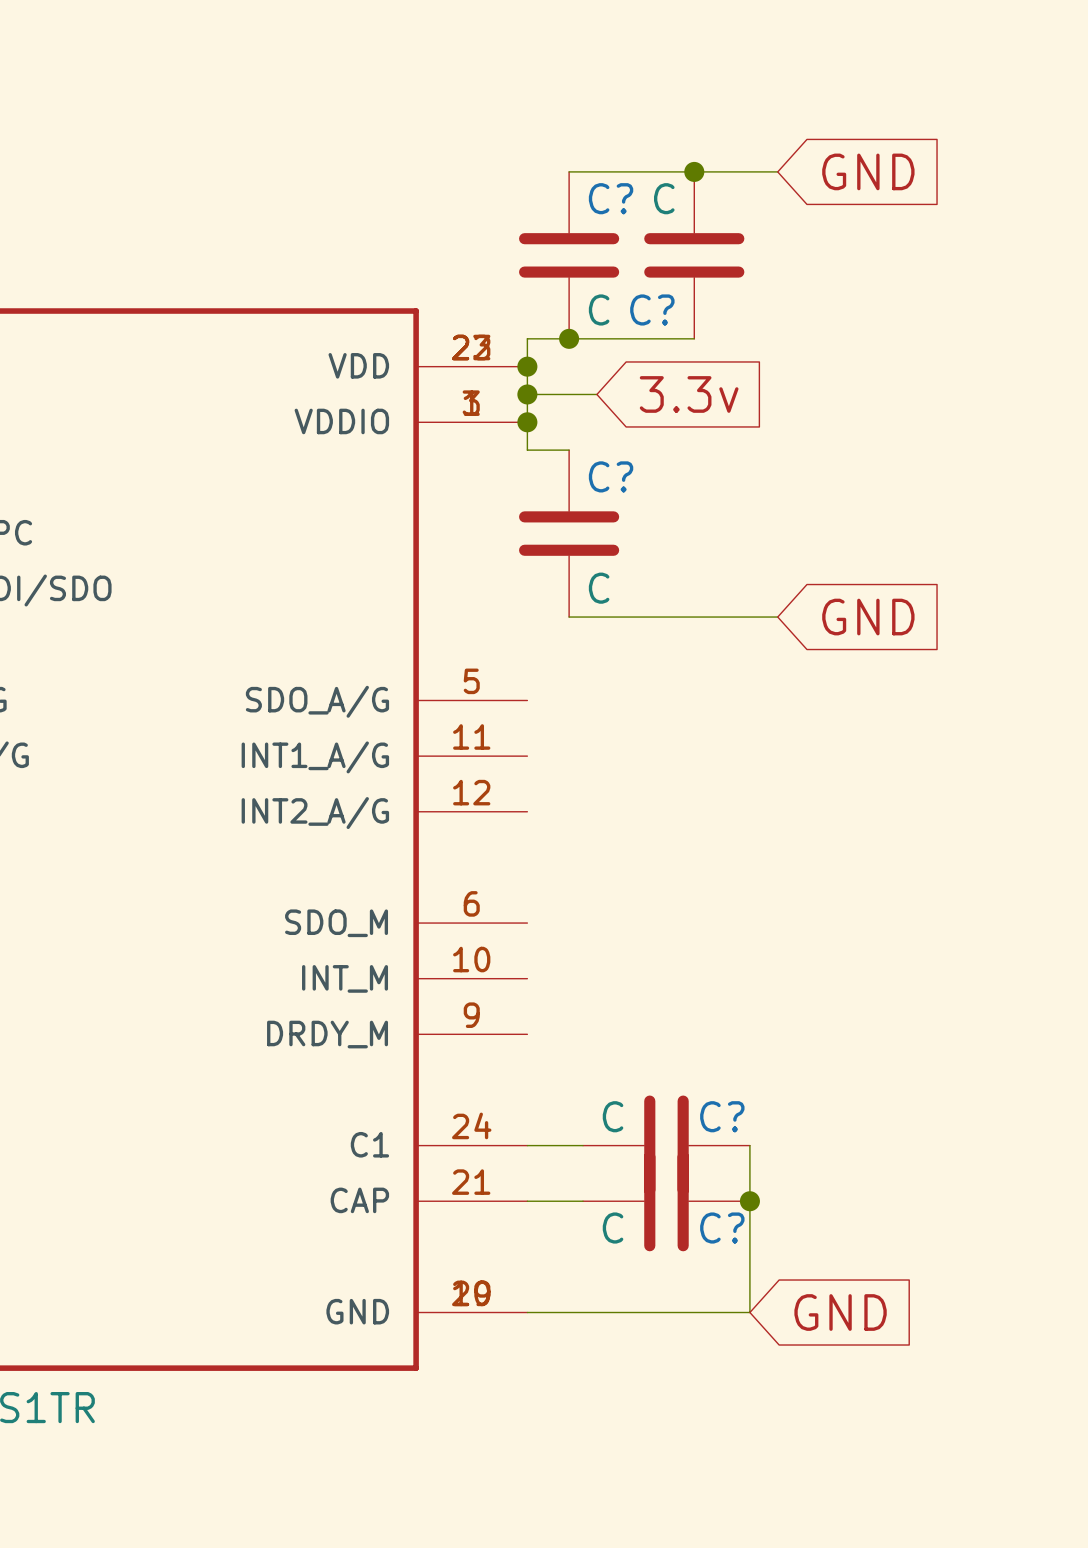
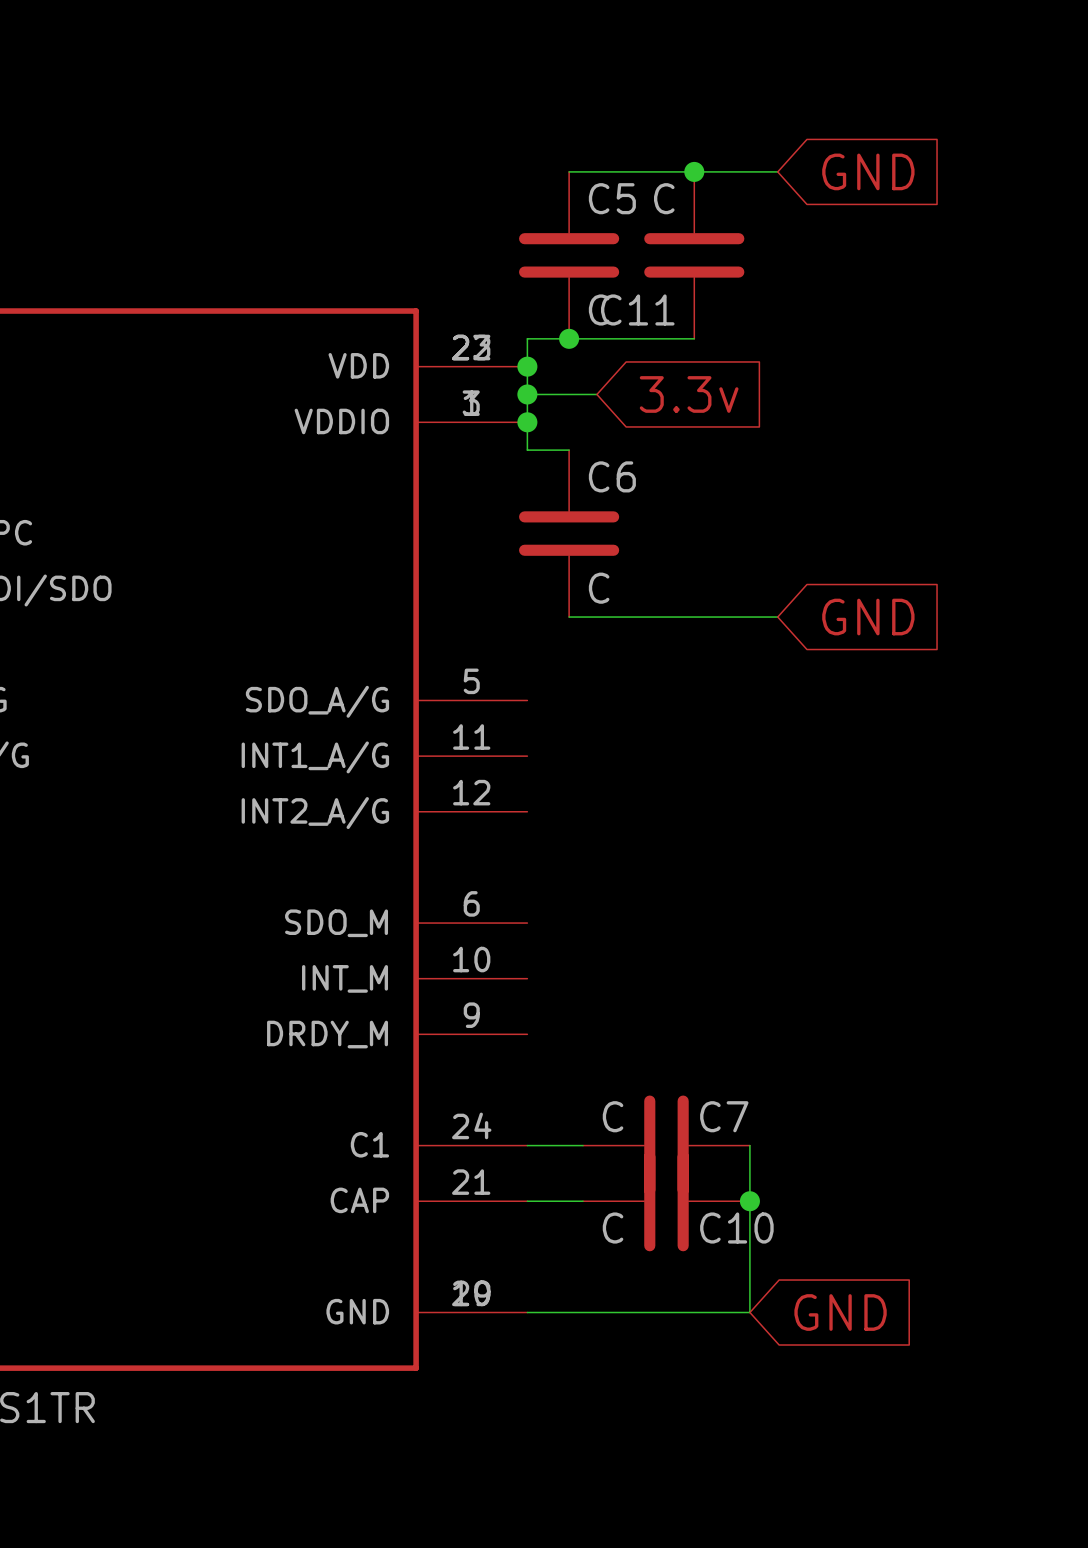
C? name: C? (611, 198) -> C5 (612, 198)
C? name: C? (652, 309) -> C11 (637, 309)
C? name: C? (611, 476) -> C6 (612, 476)
C? name: C? (722, 1116) -> C7 (724, 1116)
C? name: C? (722, 1228) -> C10 (736, 1228)

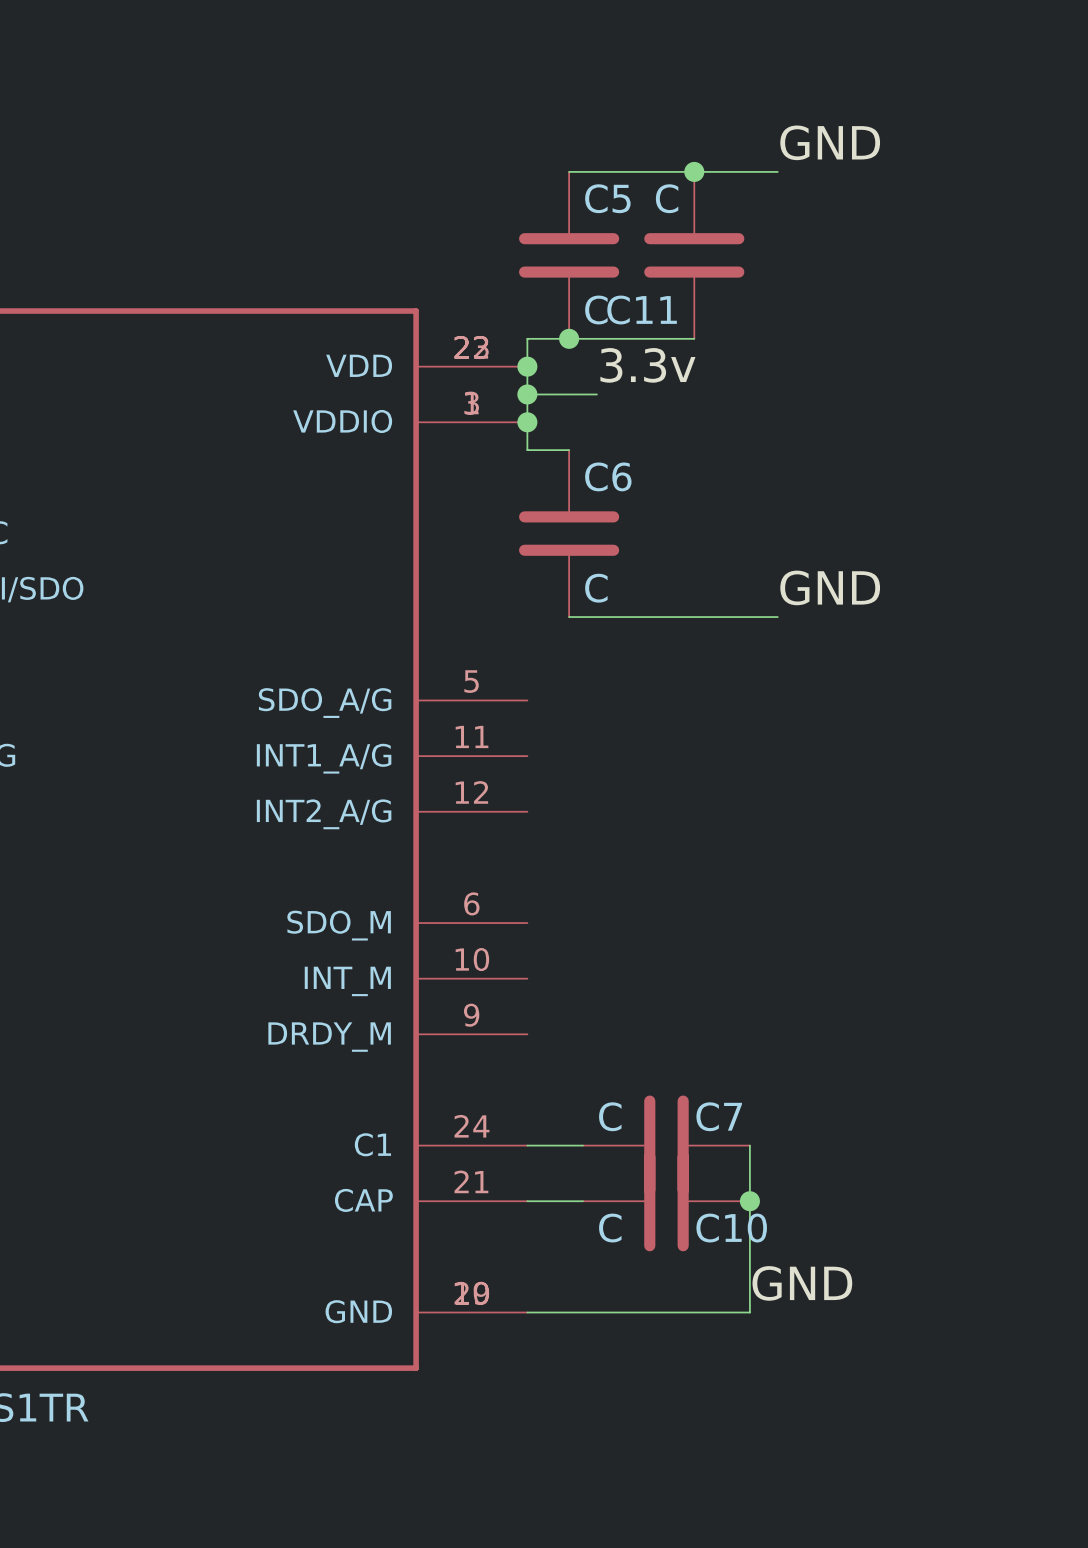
label: none -> GND (830, 142)
global label: GND (868, 171) -> none
label: none -> 3.3v (647, 365)
global label: 3.3v (689, 394) -> none
label: none -> GND (830, 587)
global label: GND (868, 617) -> none
label: none -> GND (802, 1283)
global label: GND (840, 1312) -> none

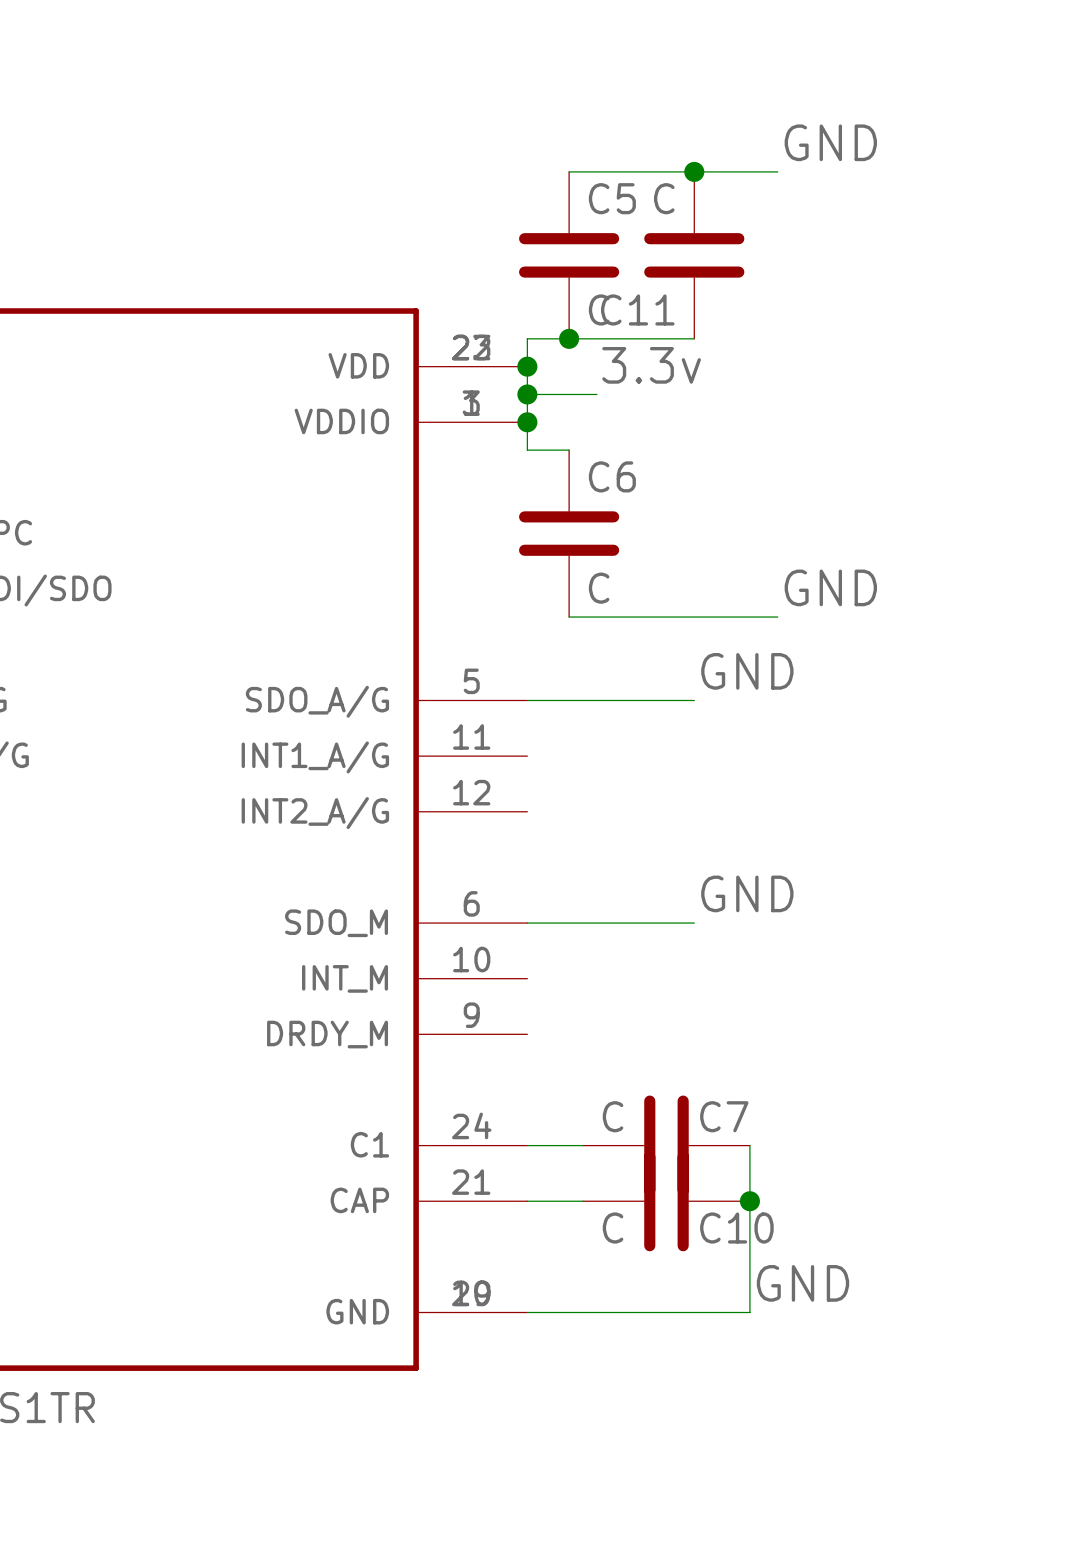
label: none -> GND (747, 671)
wire: none -> (527, 700) (694, 700)
label: none -> GND (747, 893)
wire: none -> (527, 923) (694, 923)

